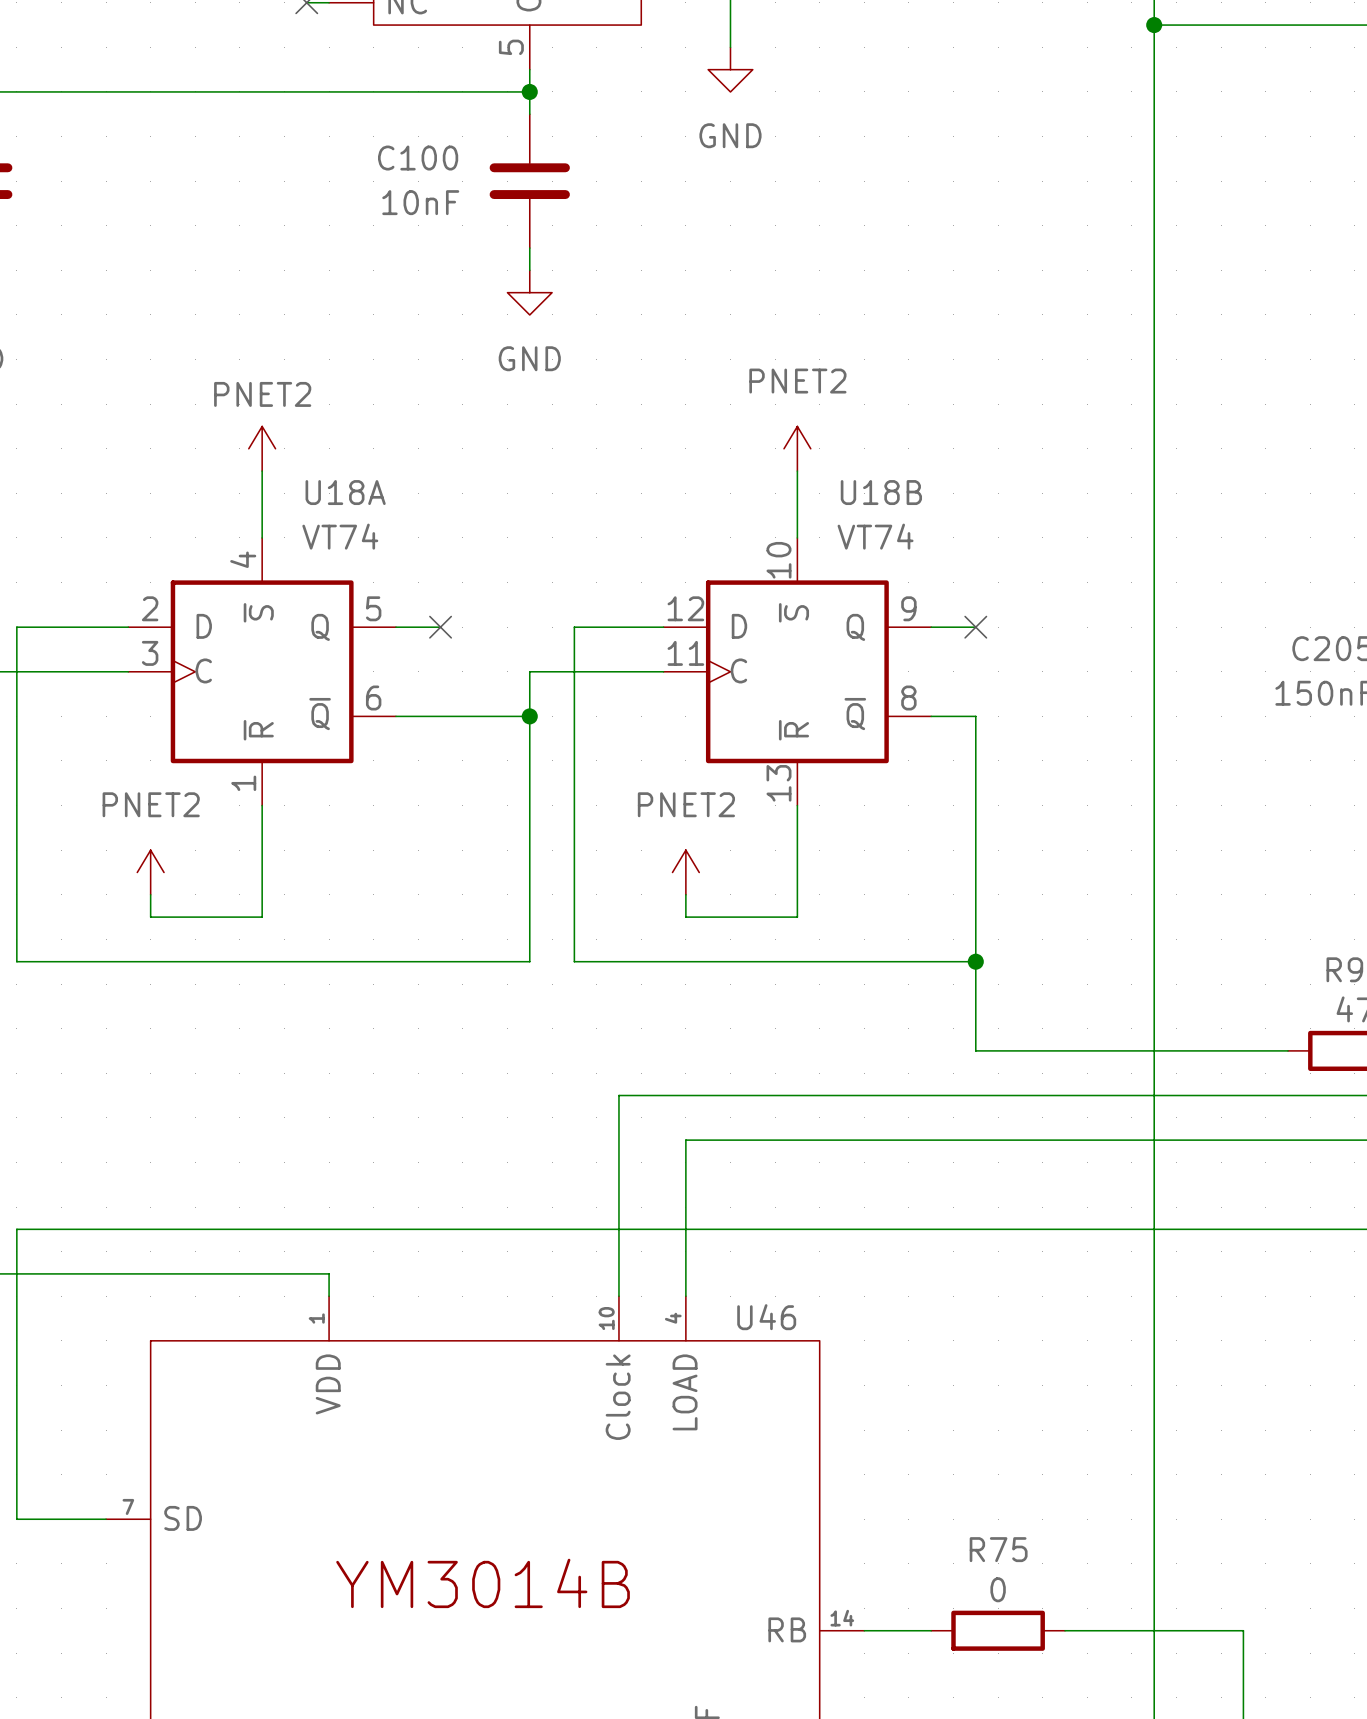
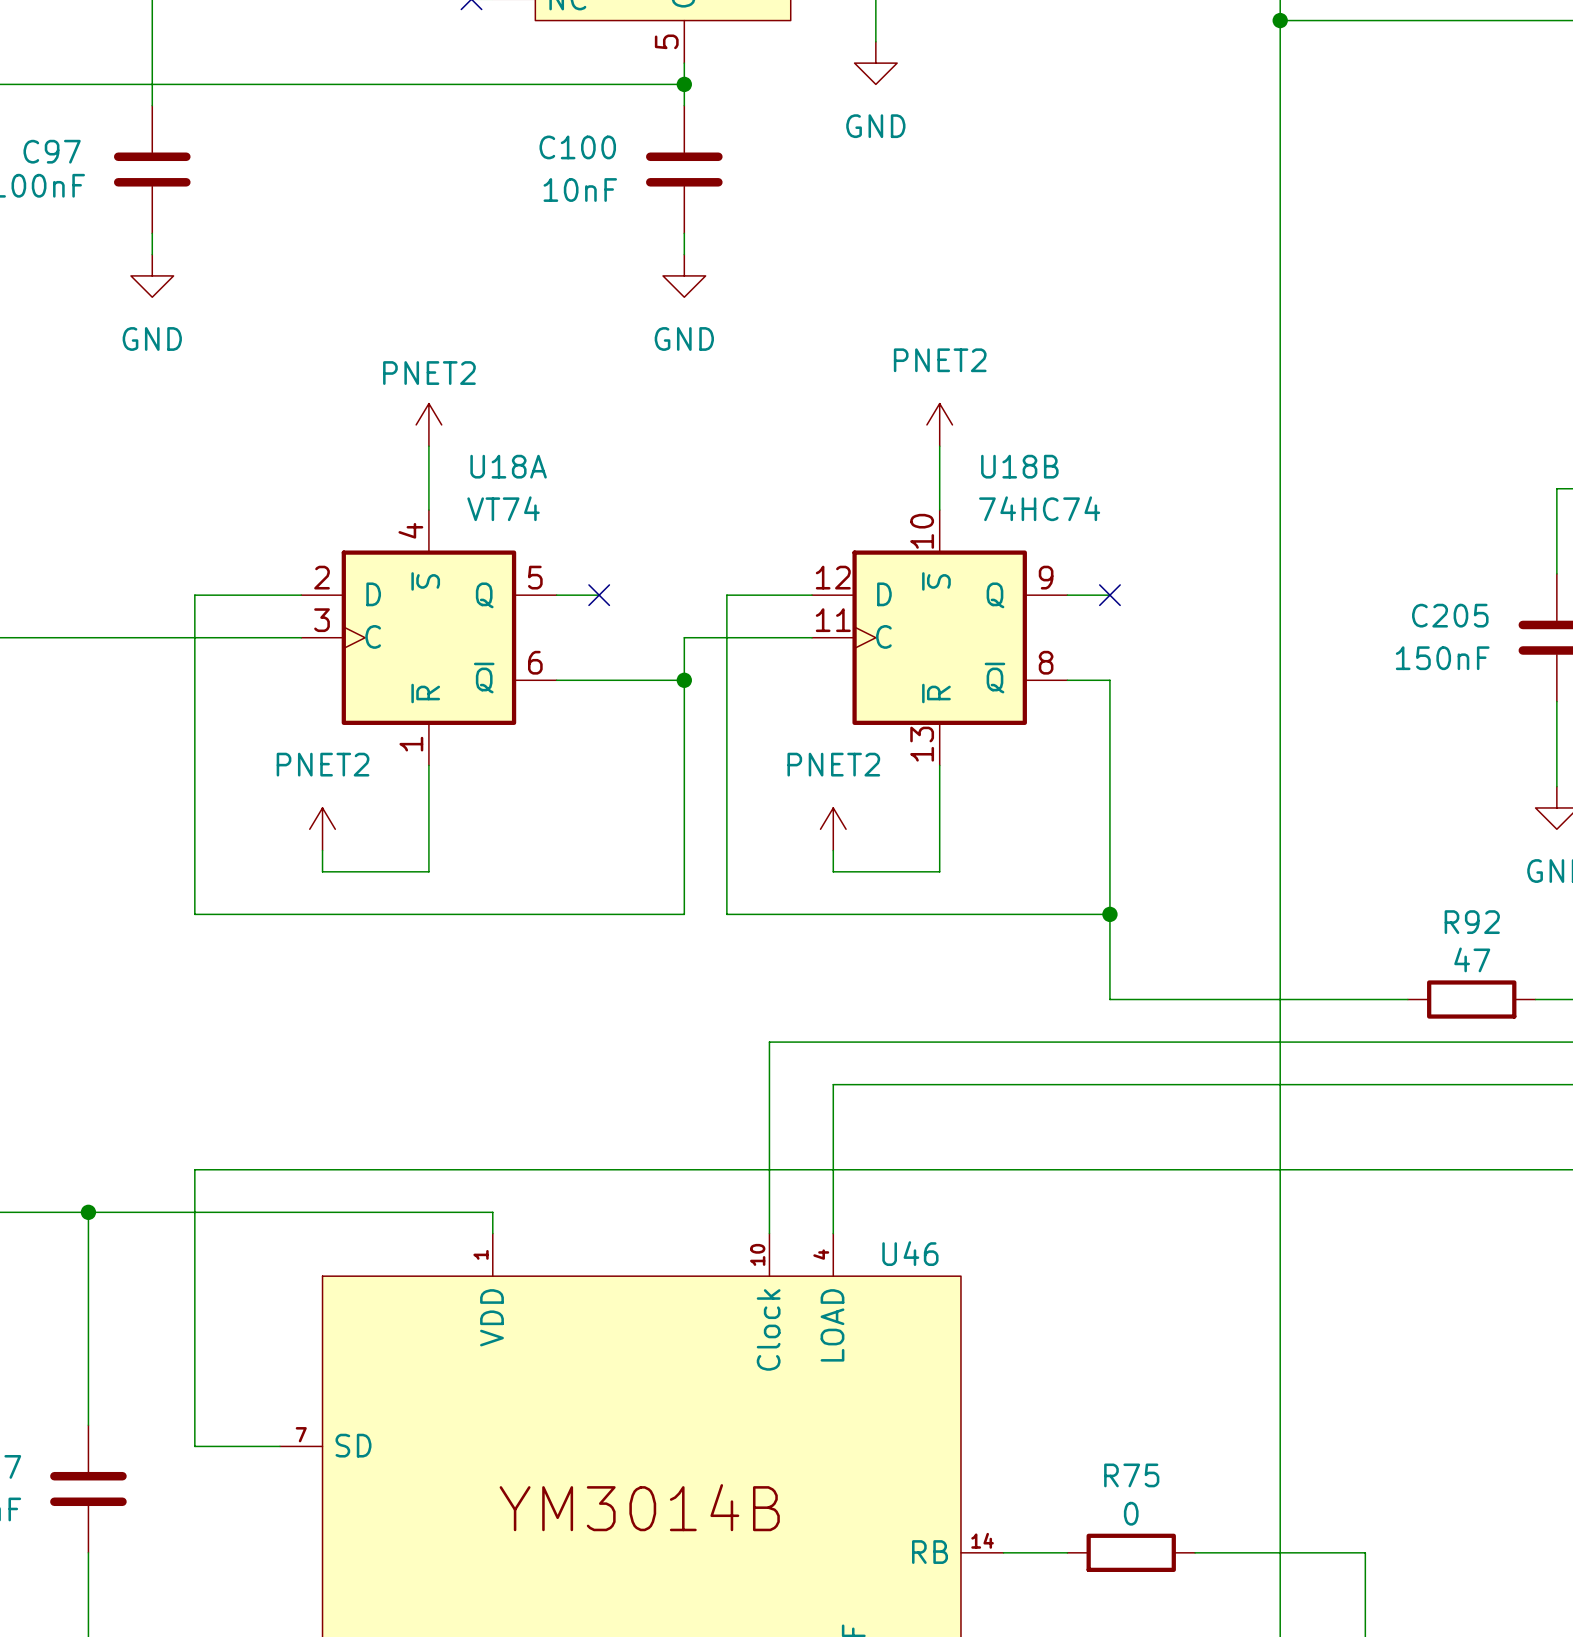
U18B value: VT74 (875, 536) -> 74HC74 (1039, 508)

